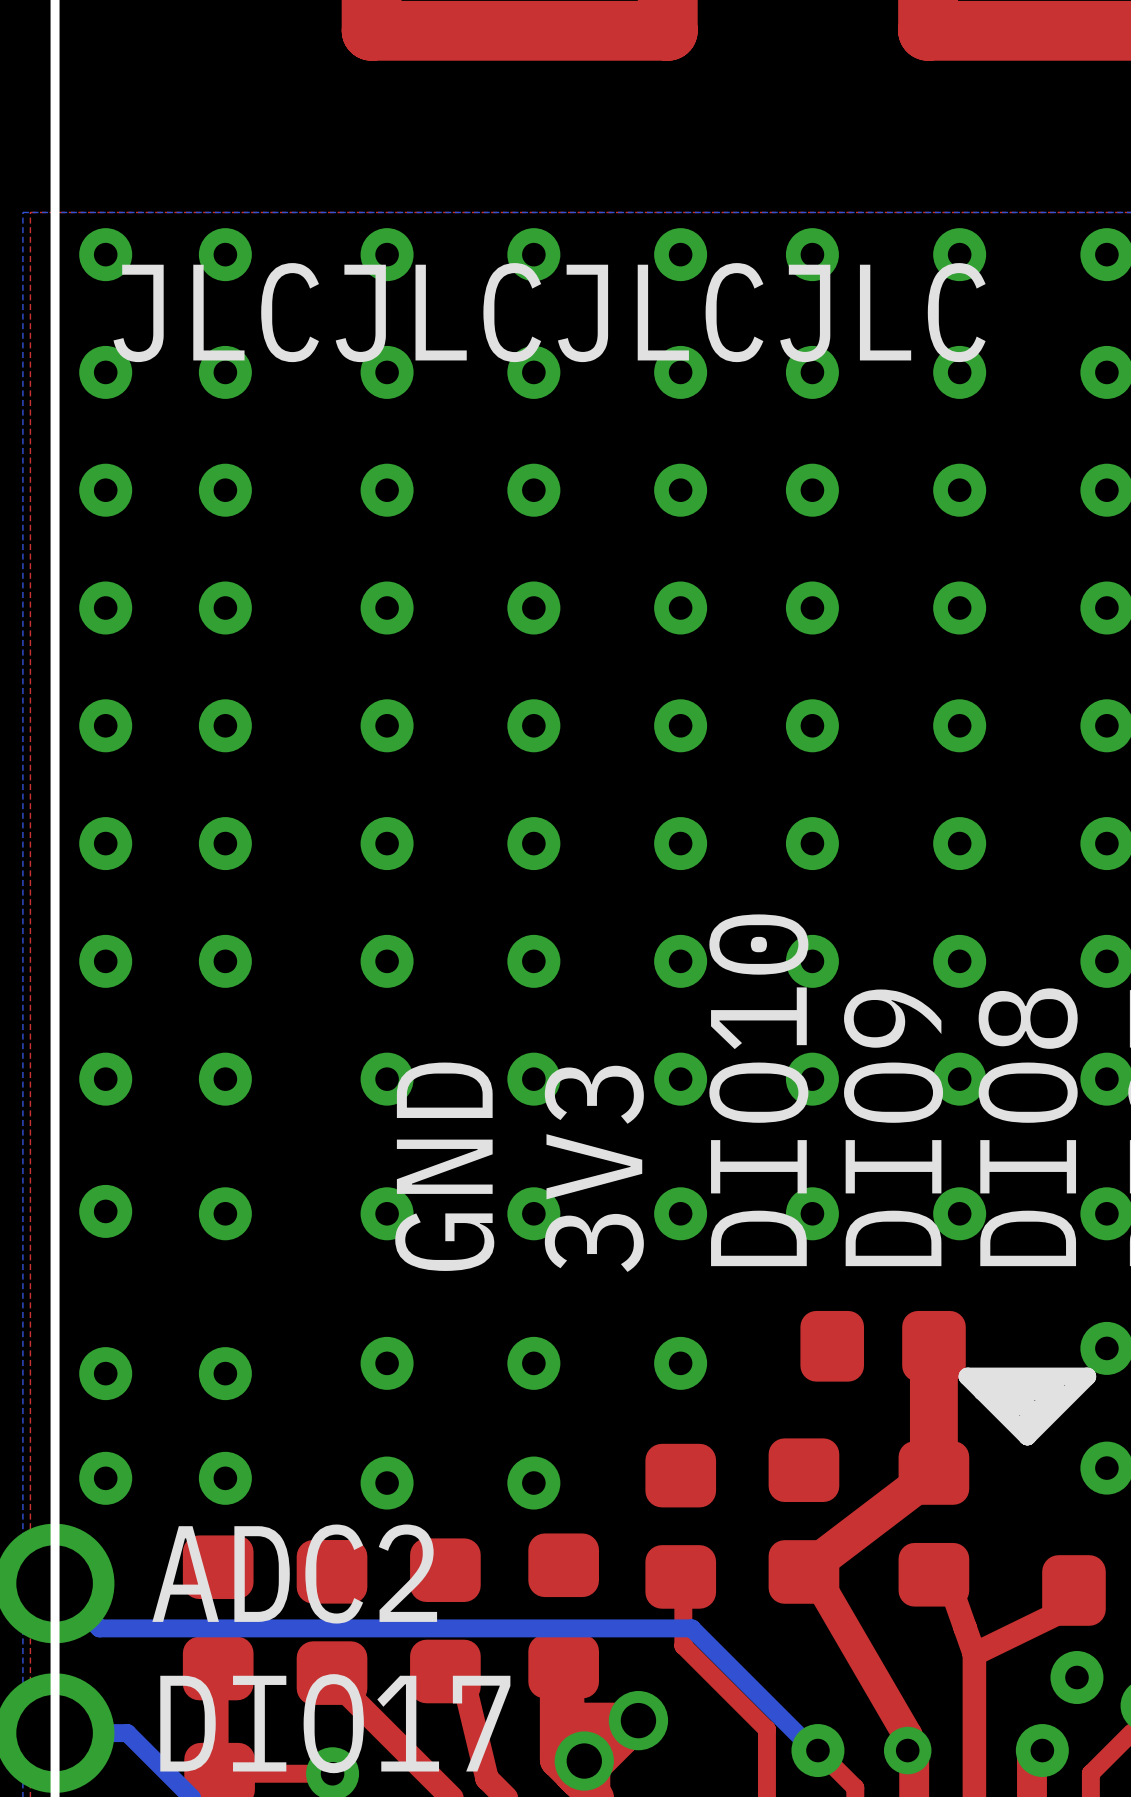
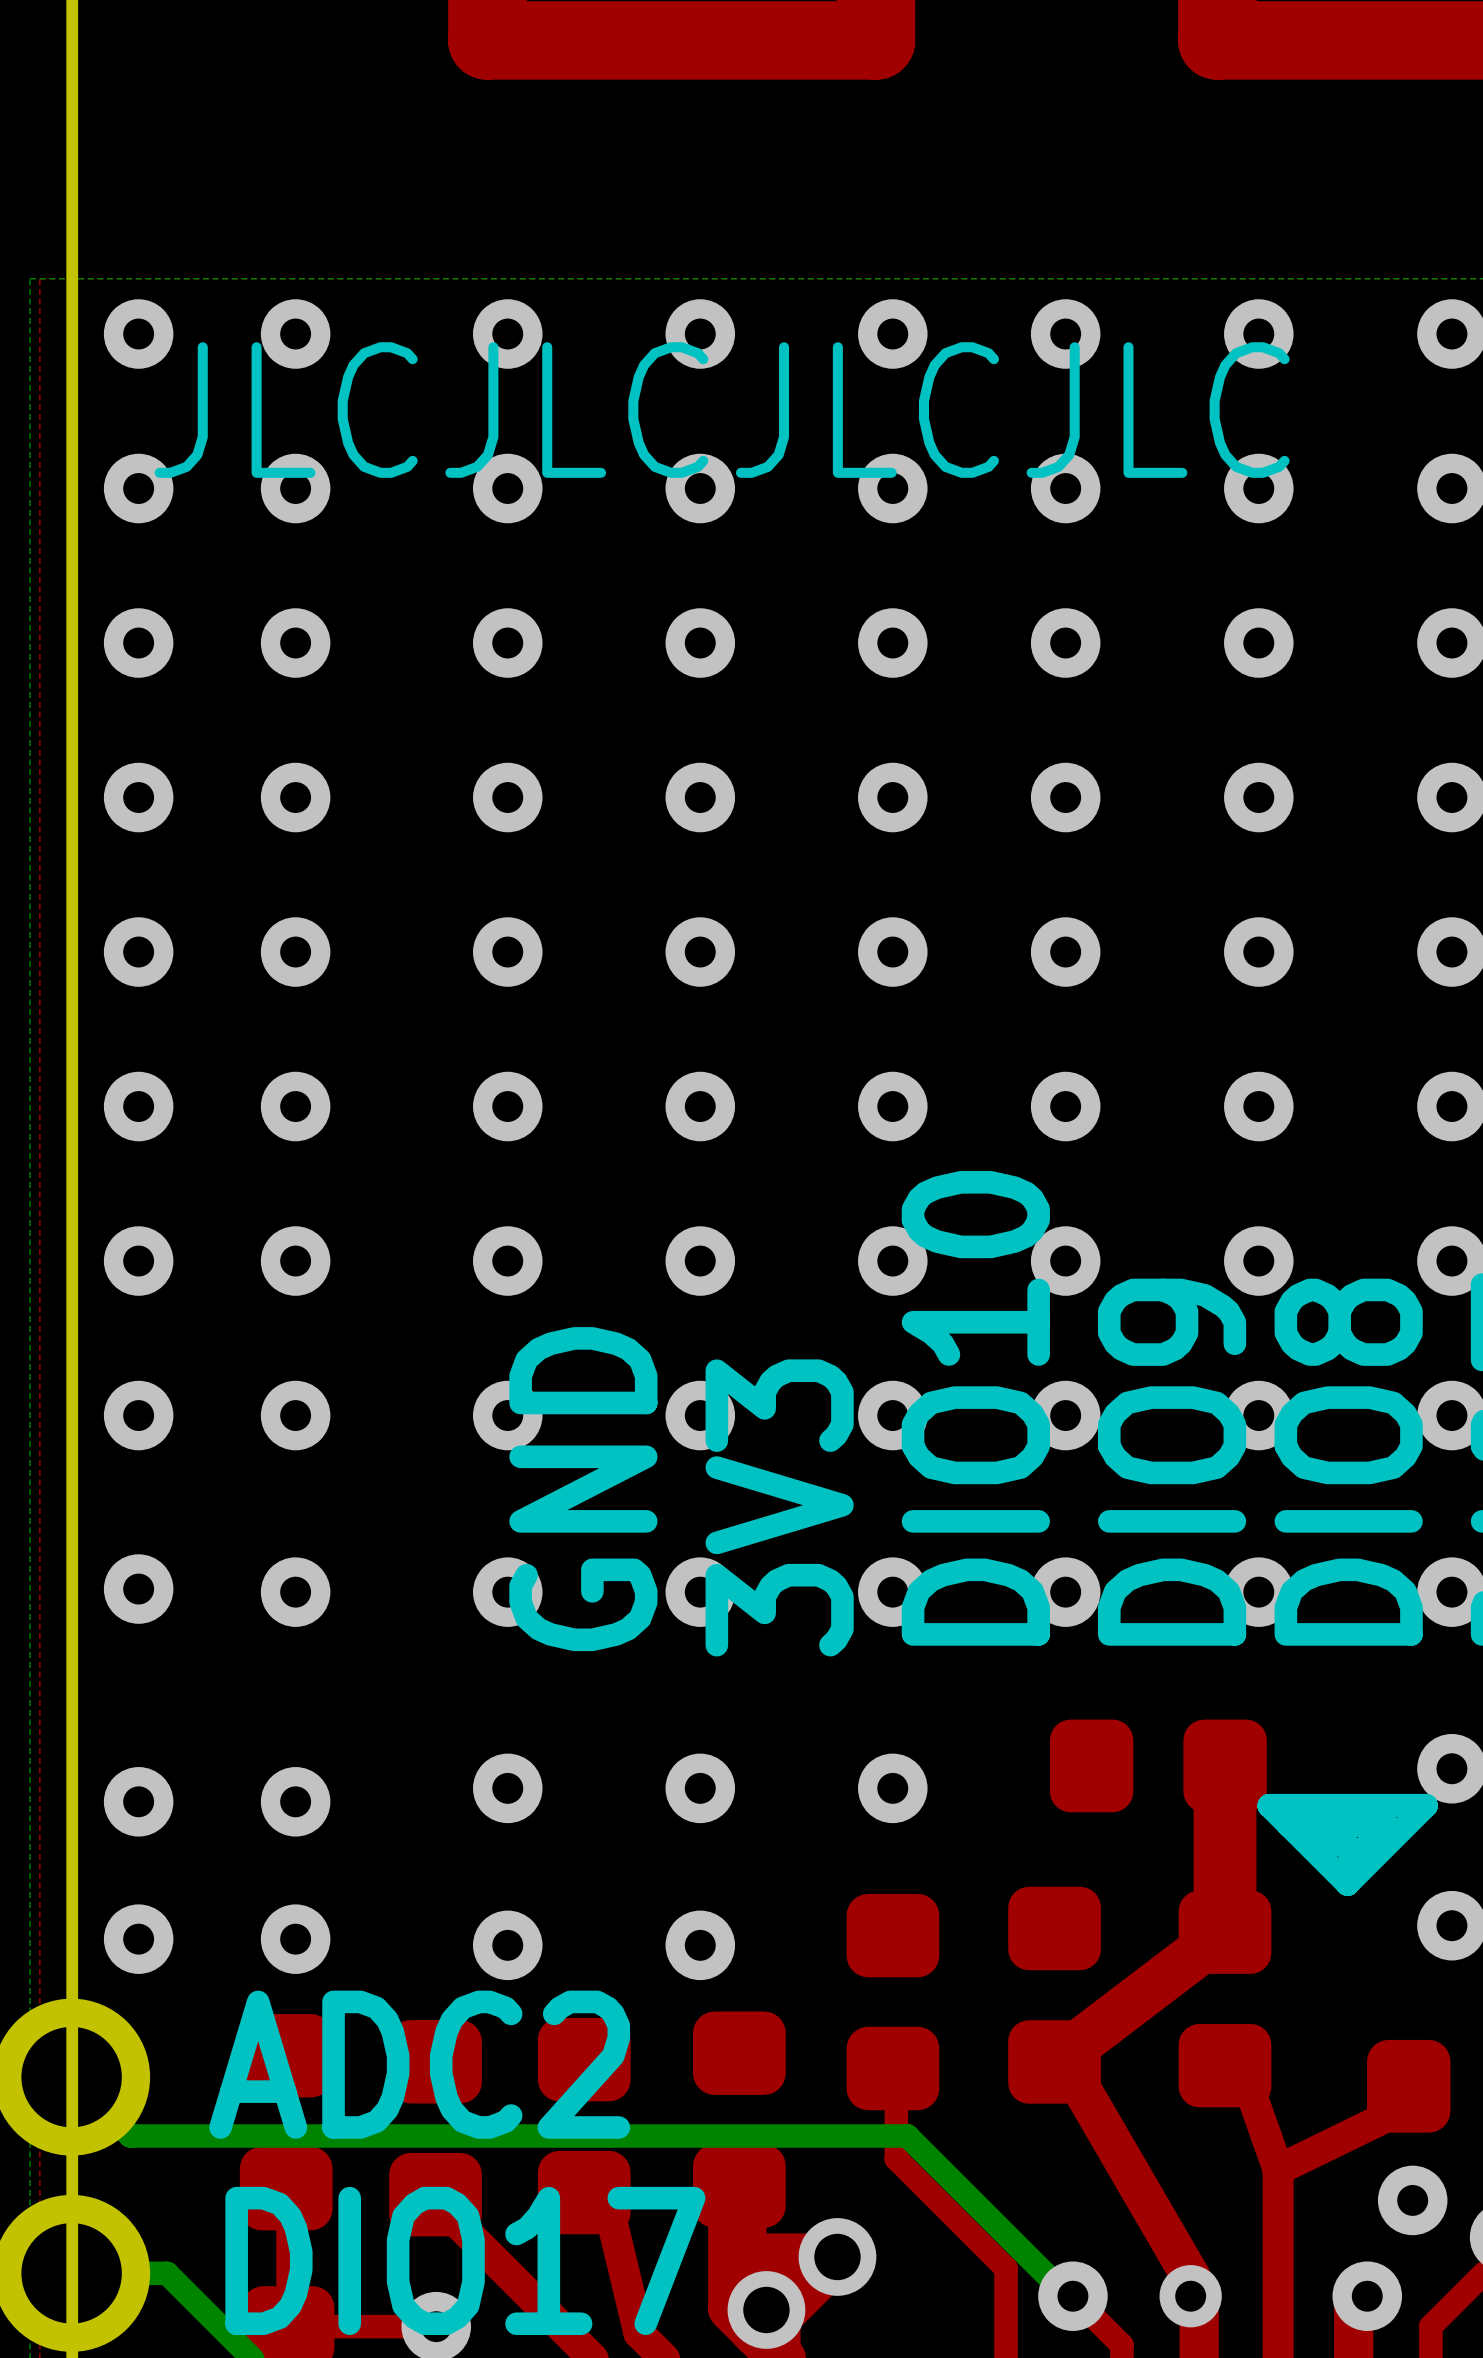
text position: DIO10 (758, 1090) -> DIO10 (975, 1408)

